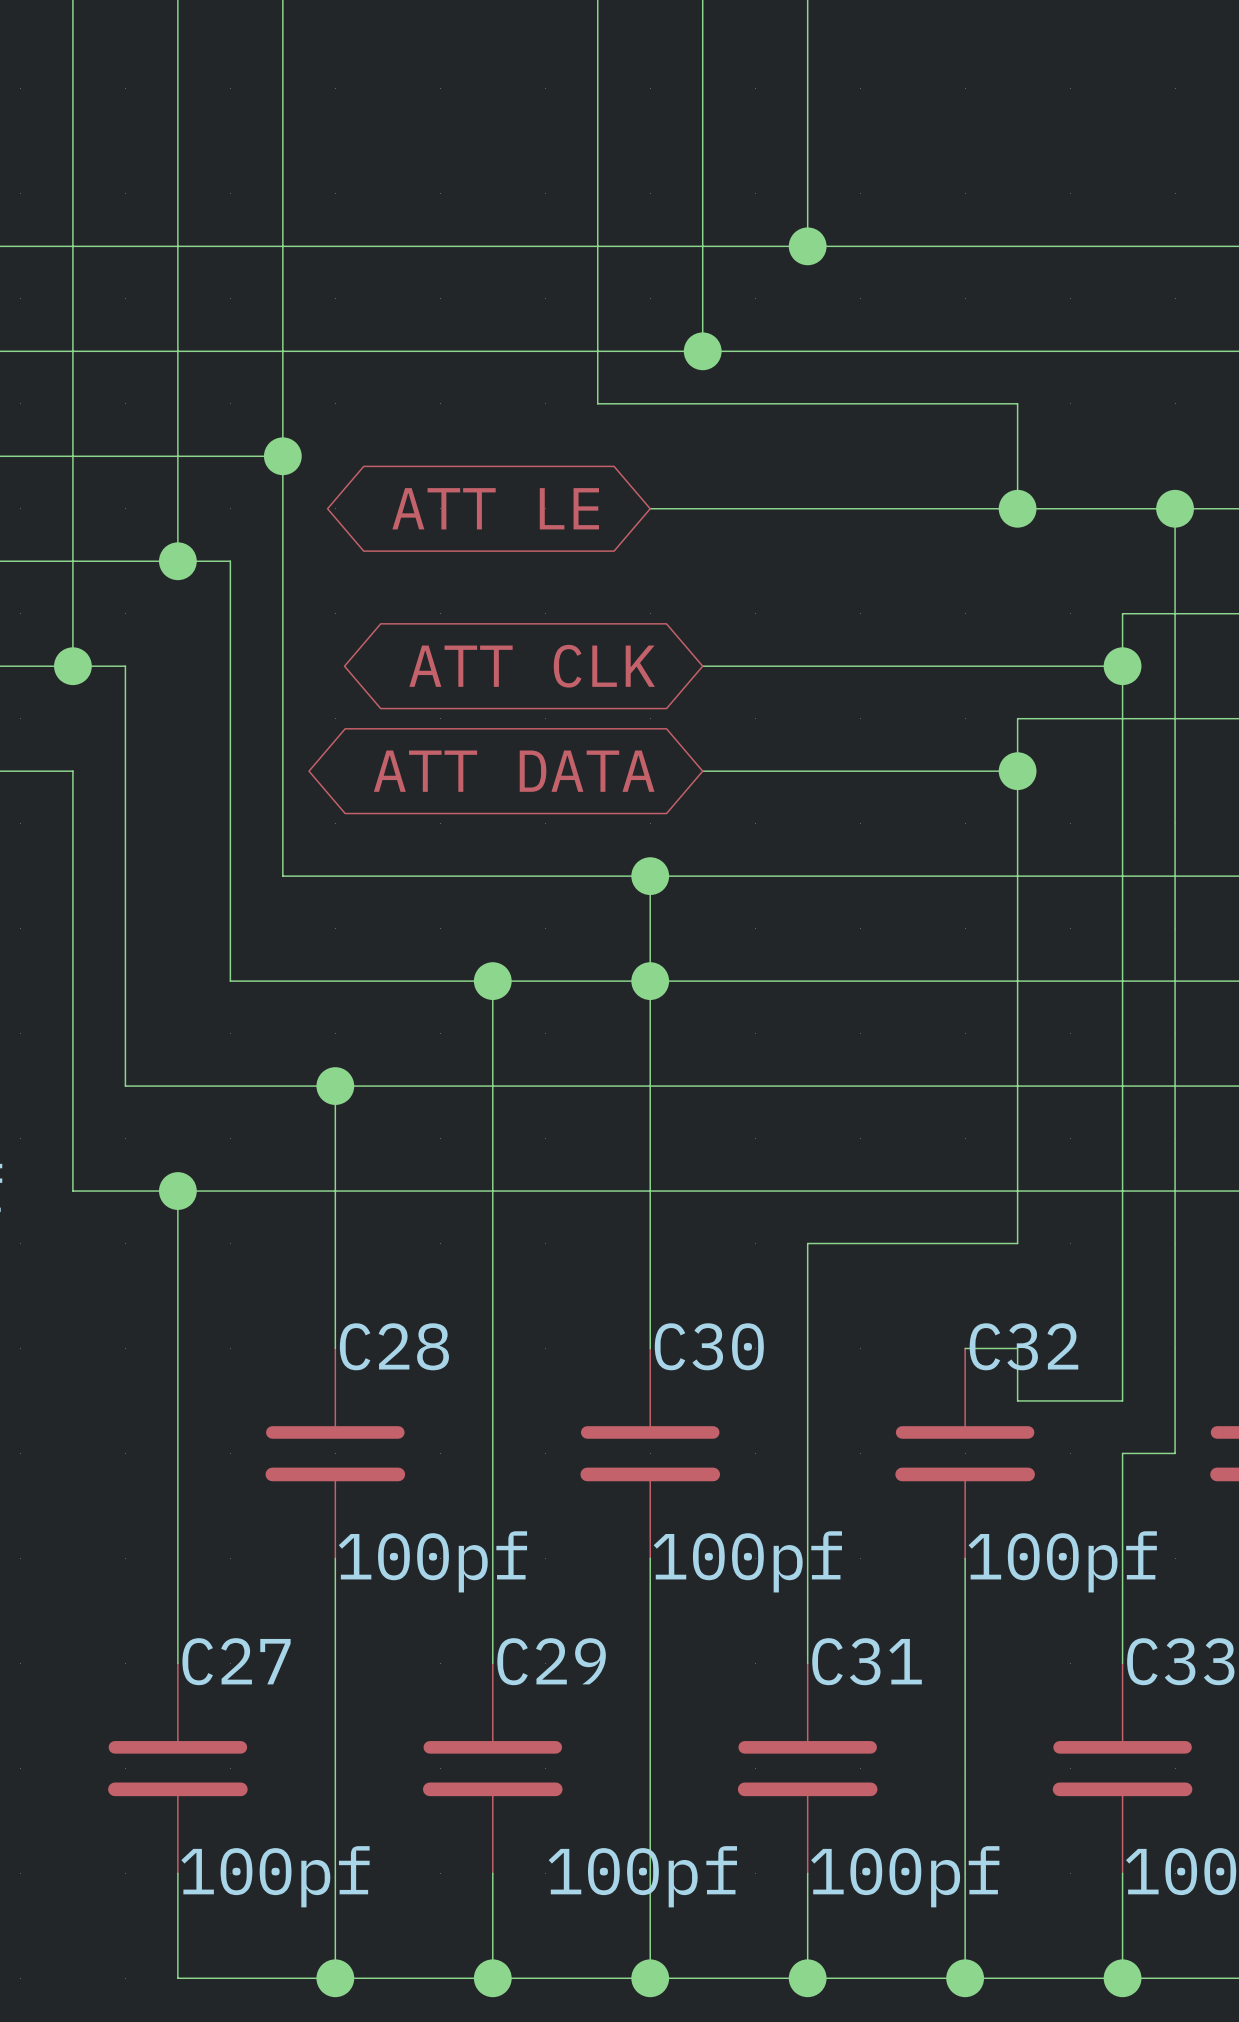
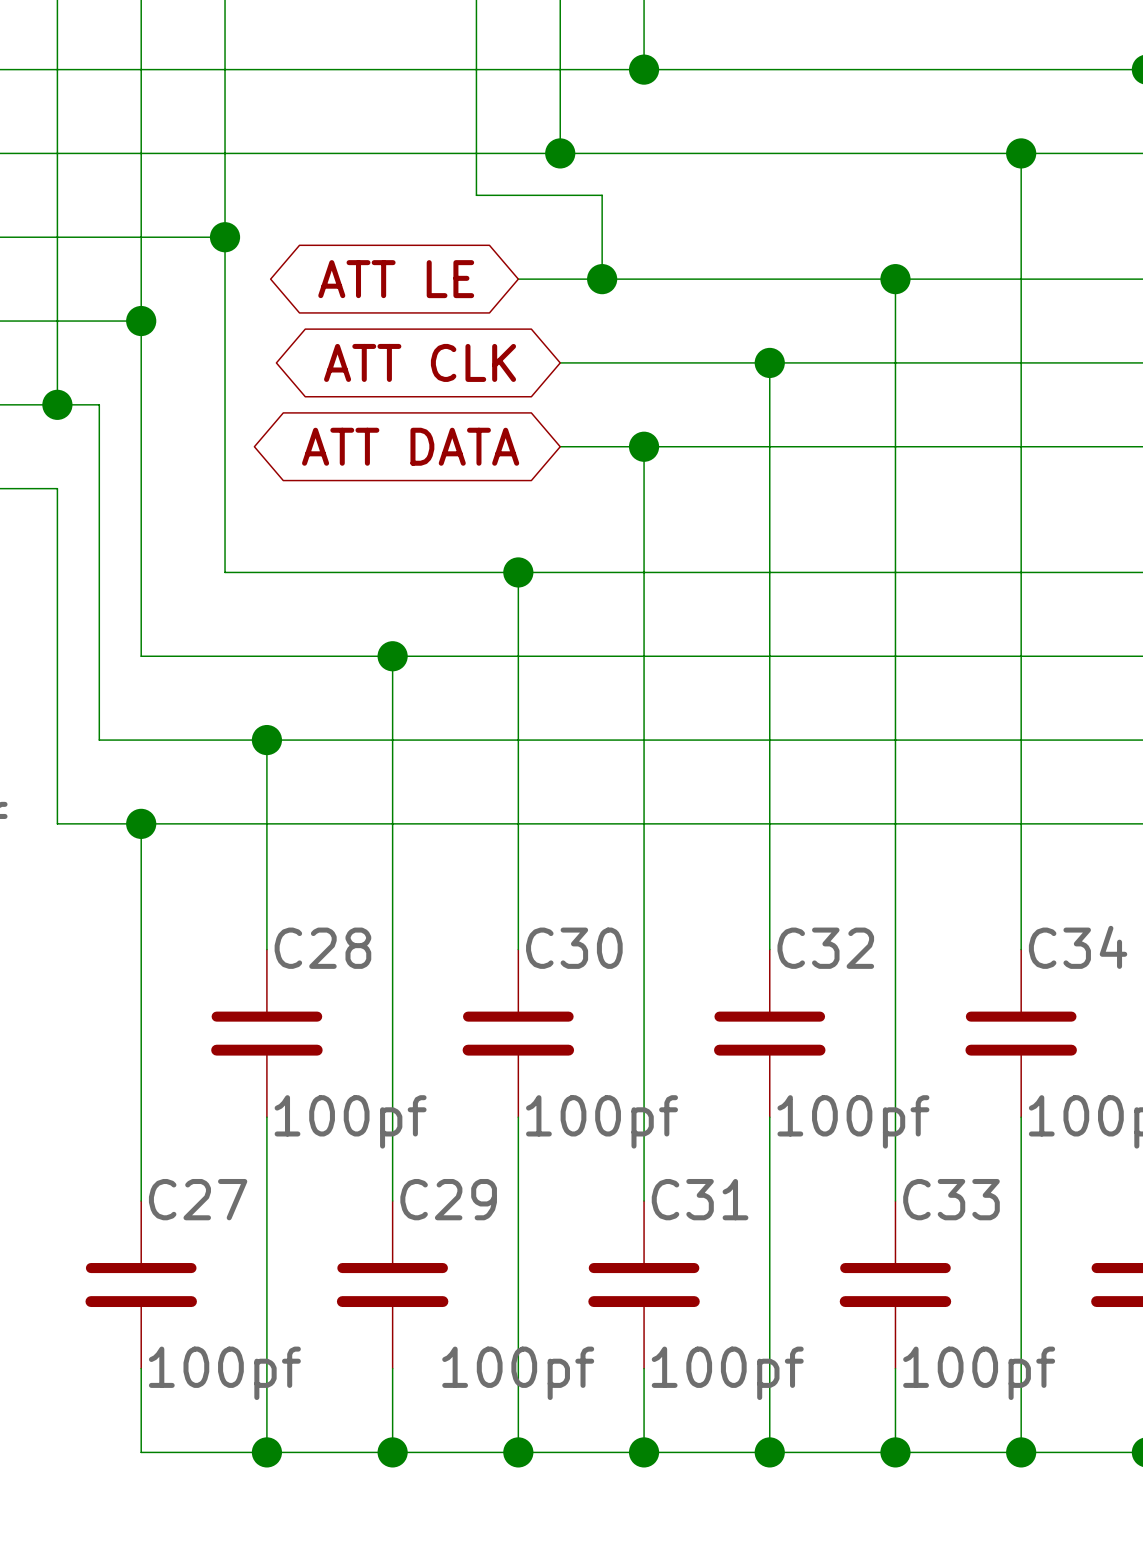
wire: (755, 403) (1017, 403) (1017, 508) -> (602, 195) (602, 279)
junction: none -> (602, 279)
junction: (1017, 508) -> none
wire: none -> (895, 279) (895, 362) (560, 362)
junction: none -> (895, 279)
wire: (1175, 508) (1175, 1453) (1122, 1453) -> none
junction: (1175, 508) -> none
wire: (177, 561) (230, 561) (230, 981) -> (141, 321) (141, 656) (183, 656)
wire: none -> (769, 362) (769, 949)
junction: none -> (769, 362)
global label position: ATT CLK (532, 666) -> ATT CLK (420, 362)
wire: (702, 666) (1122, 666) -> none
junction: (1122, 666) -> none
junction: none -> (644, 446)
wire: (1017, 718) (1017, 1243) (807, 1243) -> (644, 446) (644, 865)
global label position: ATT DATA (514, 771) -> ATT DATA (410, 446)
wire: (702, 771) (1017, 771) -> (560, 446) (811, 446)
junction: (1017, 771) -> none
junction: (650, 981) -> none
wire: (965, 1348) (1017, 1348) (1017, 1400) (1122, 1400) -> (895, 1033) (895, 991)

